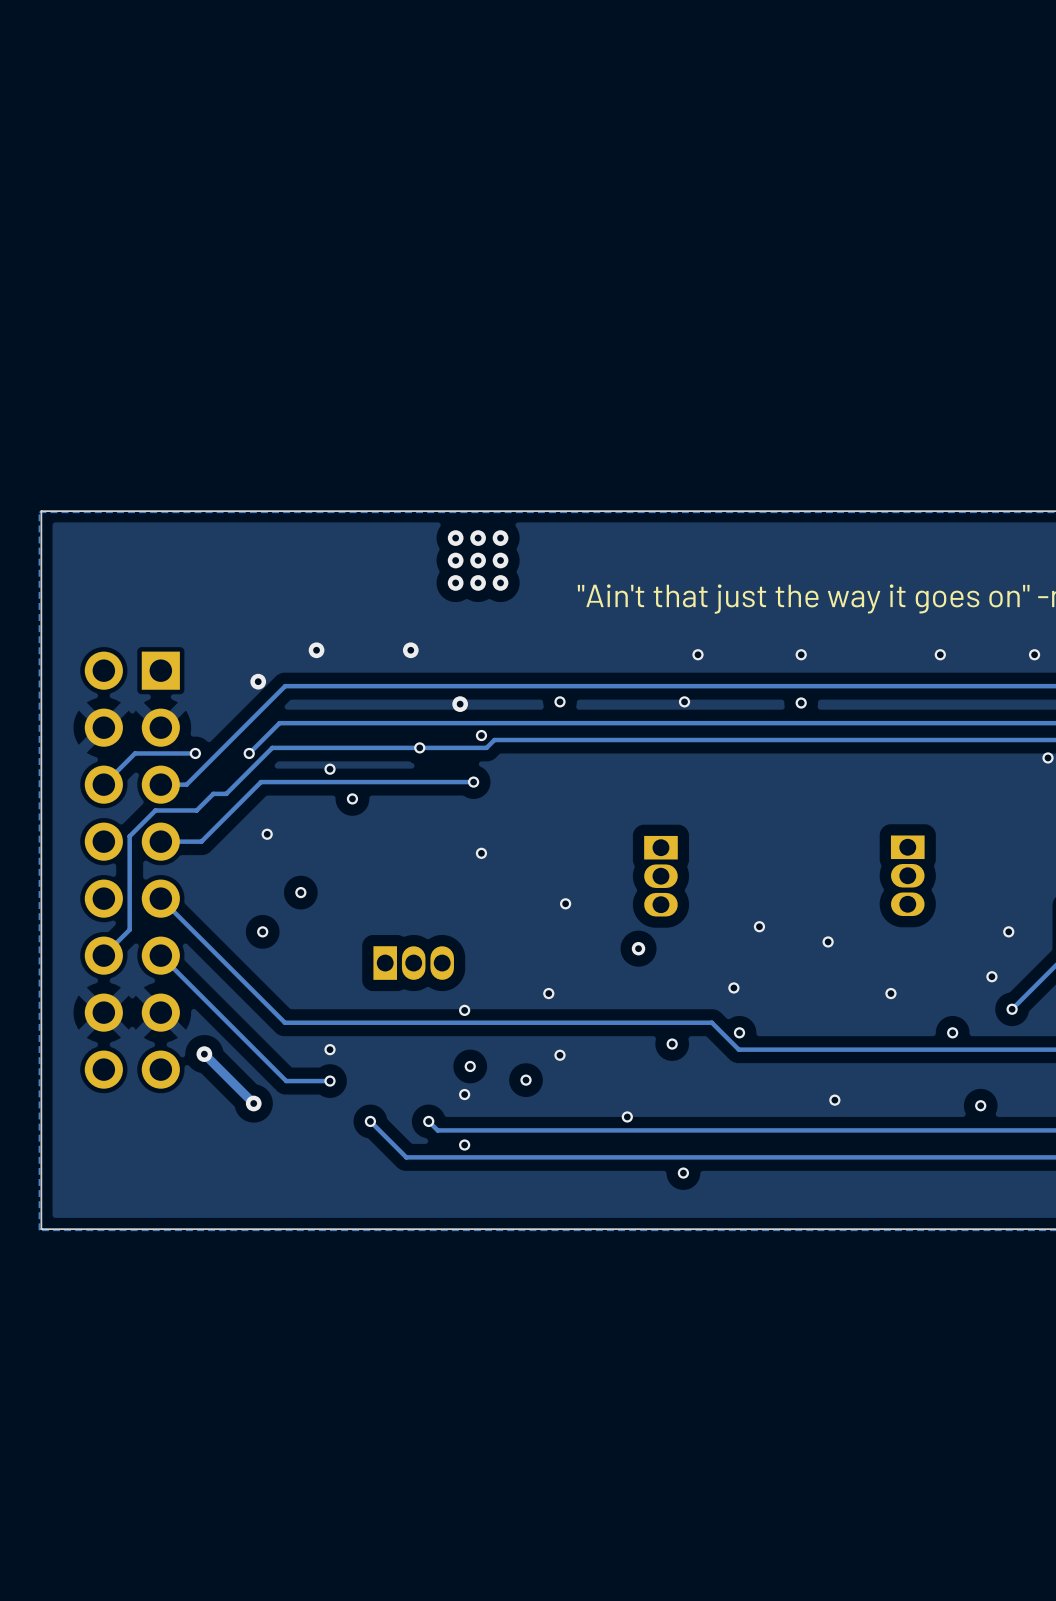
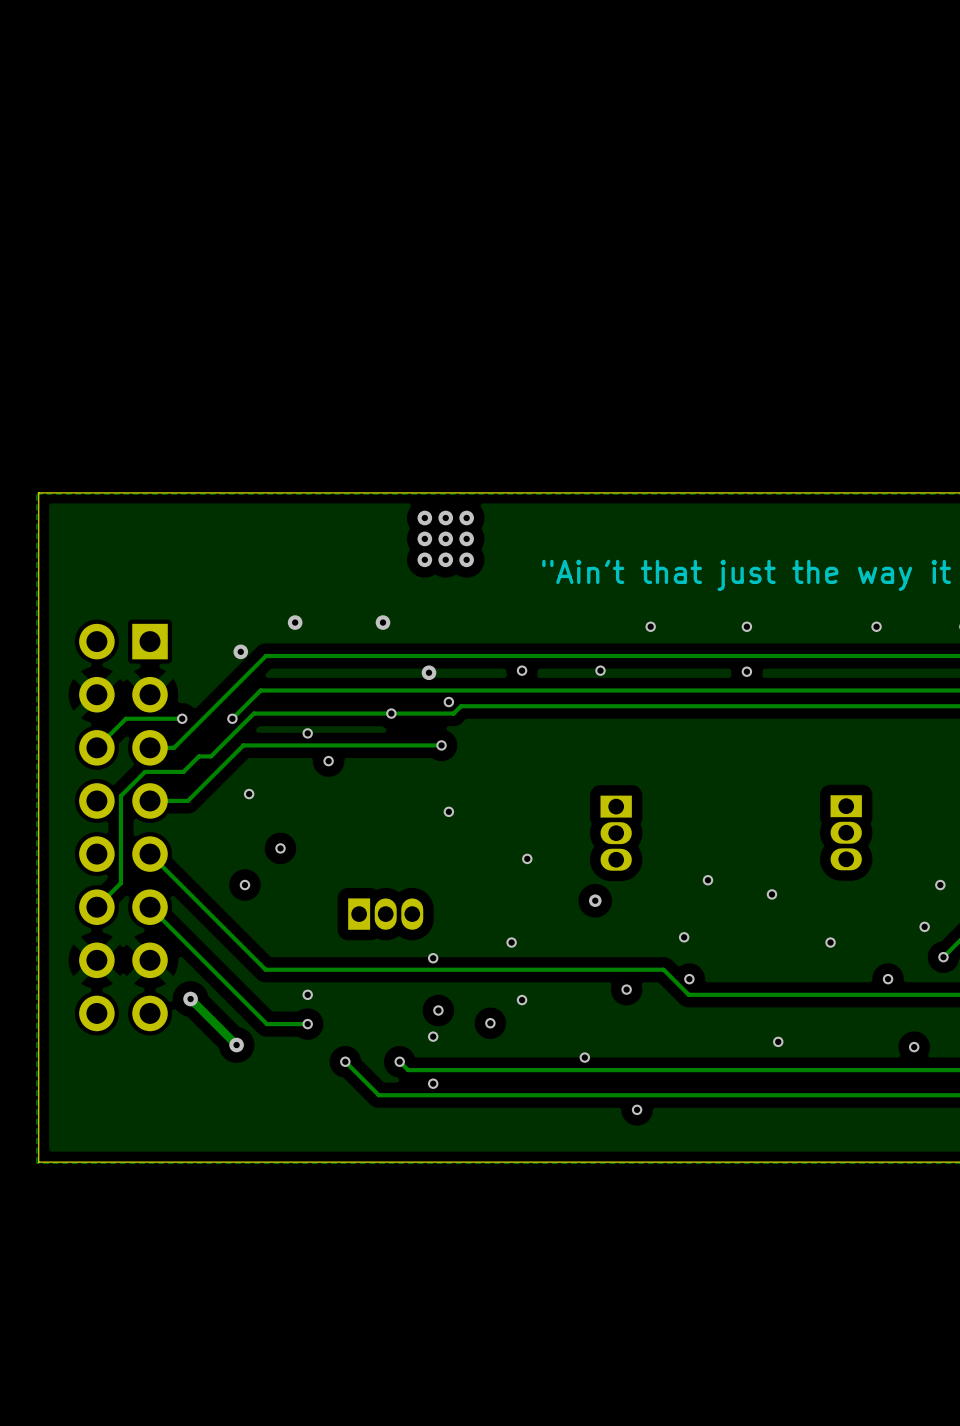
via position: (684, 701) -> (600, 670)

